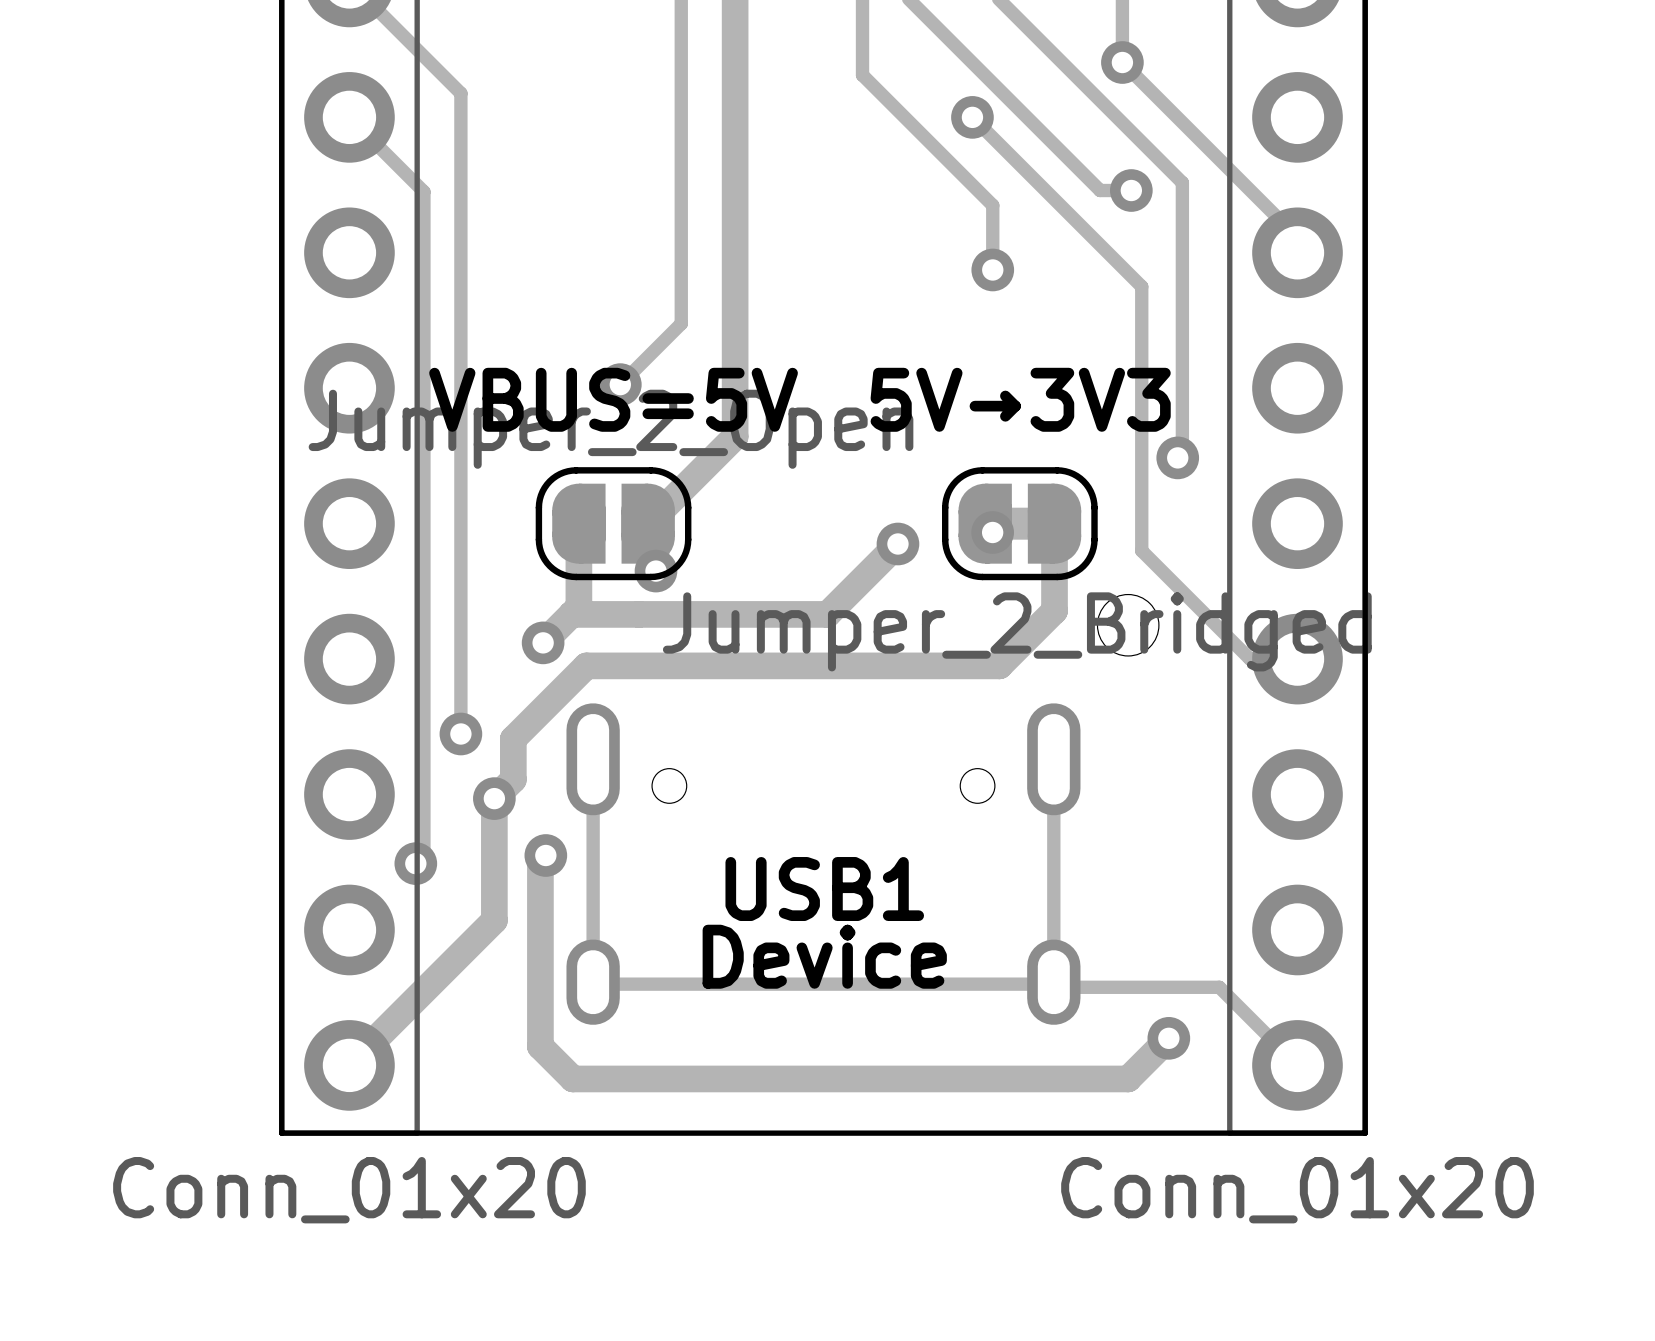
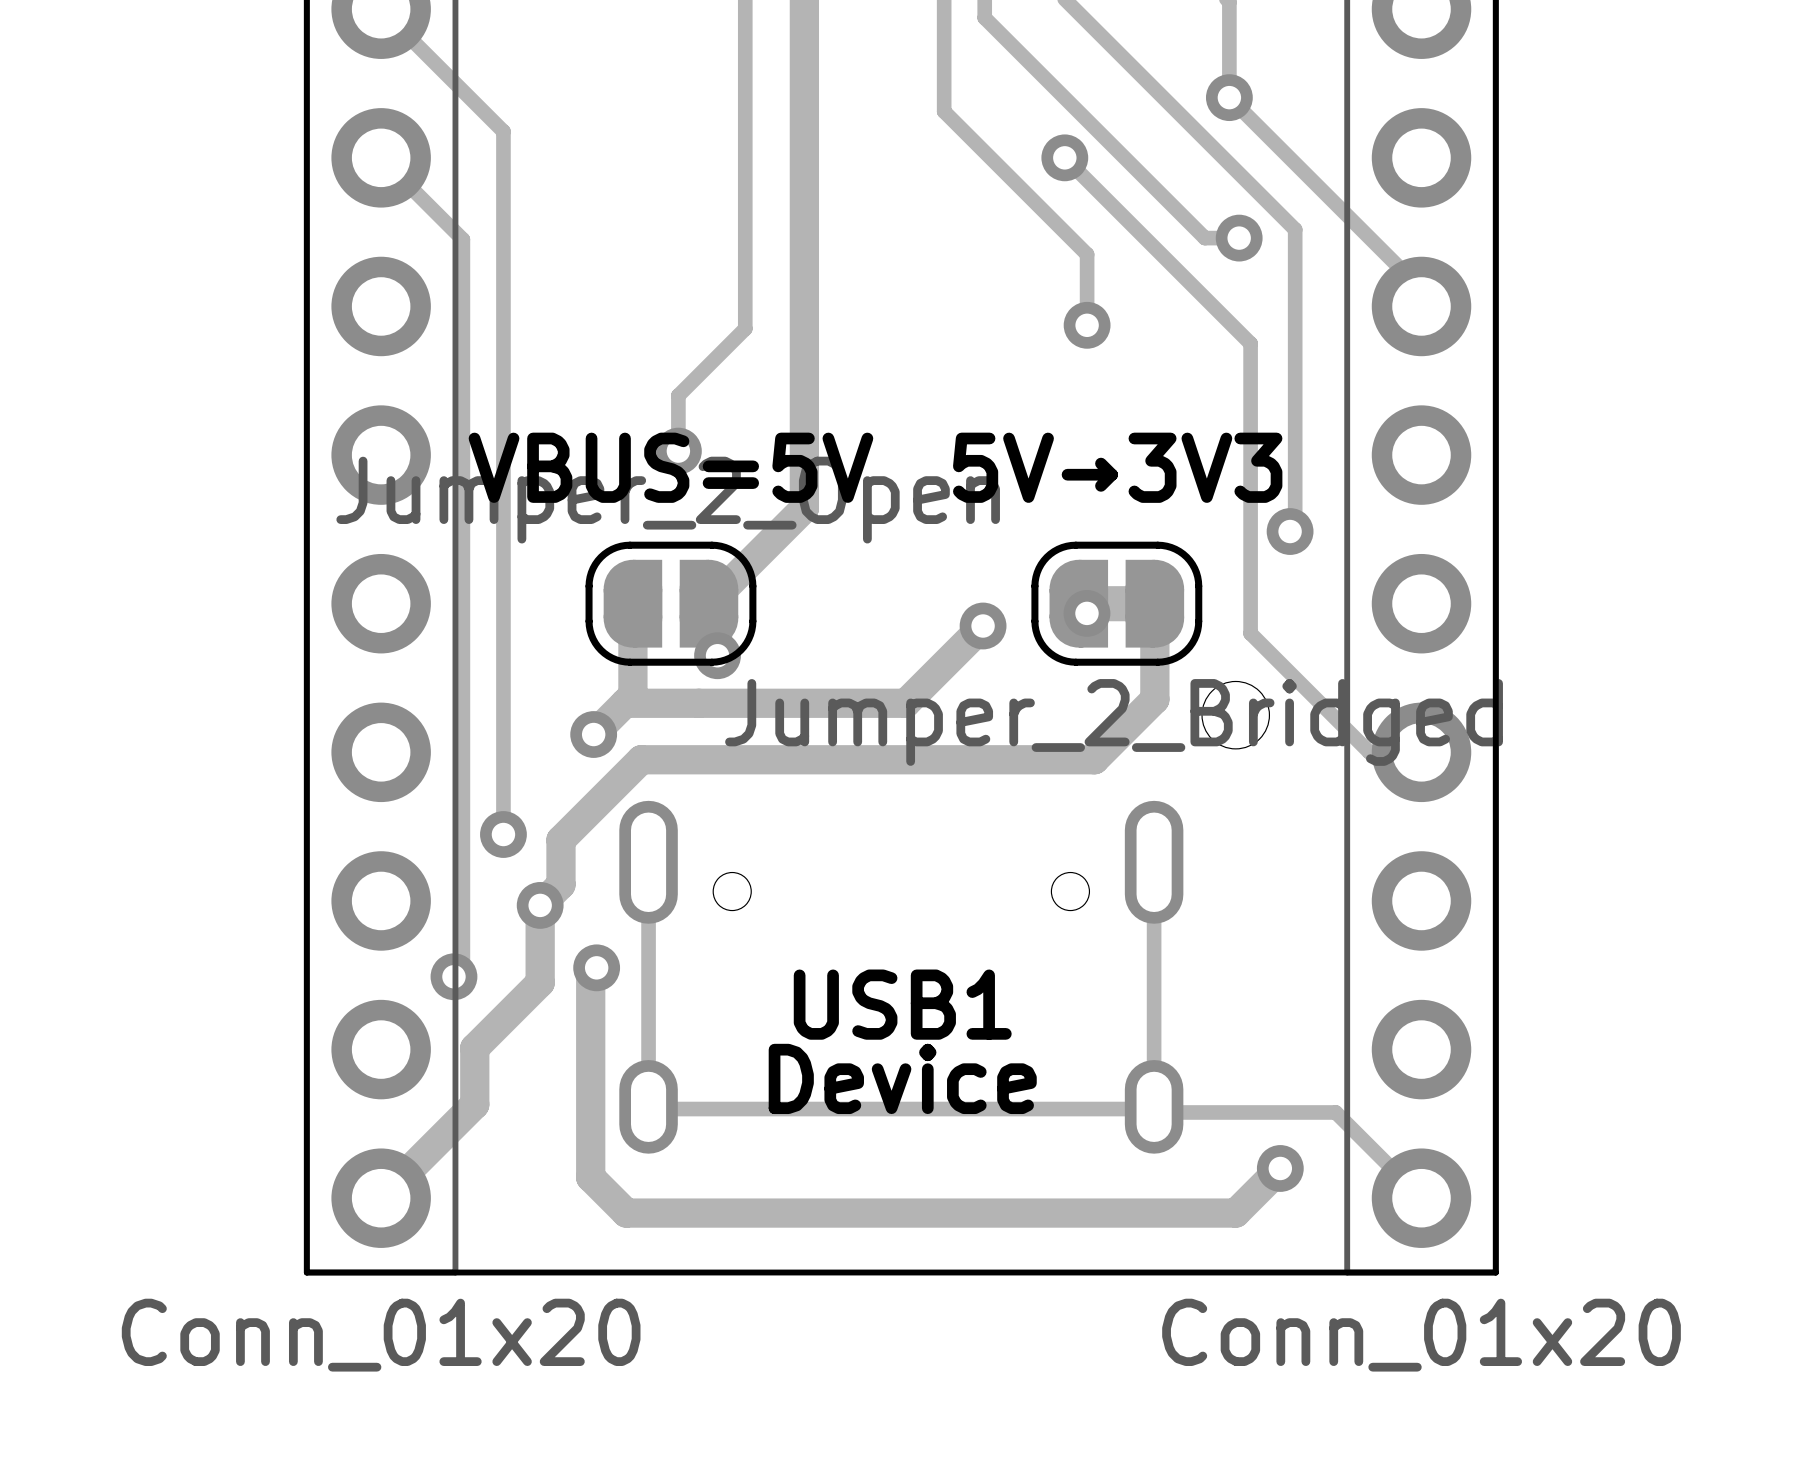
track: (681, 273) (681, 323) (620, 384) -> (745, 328) (678, 395) (678, 451)
track: (494, 869) (494, 920) (434, 980) -> (540, 982) (474, 1048) (474, 1104)

